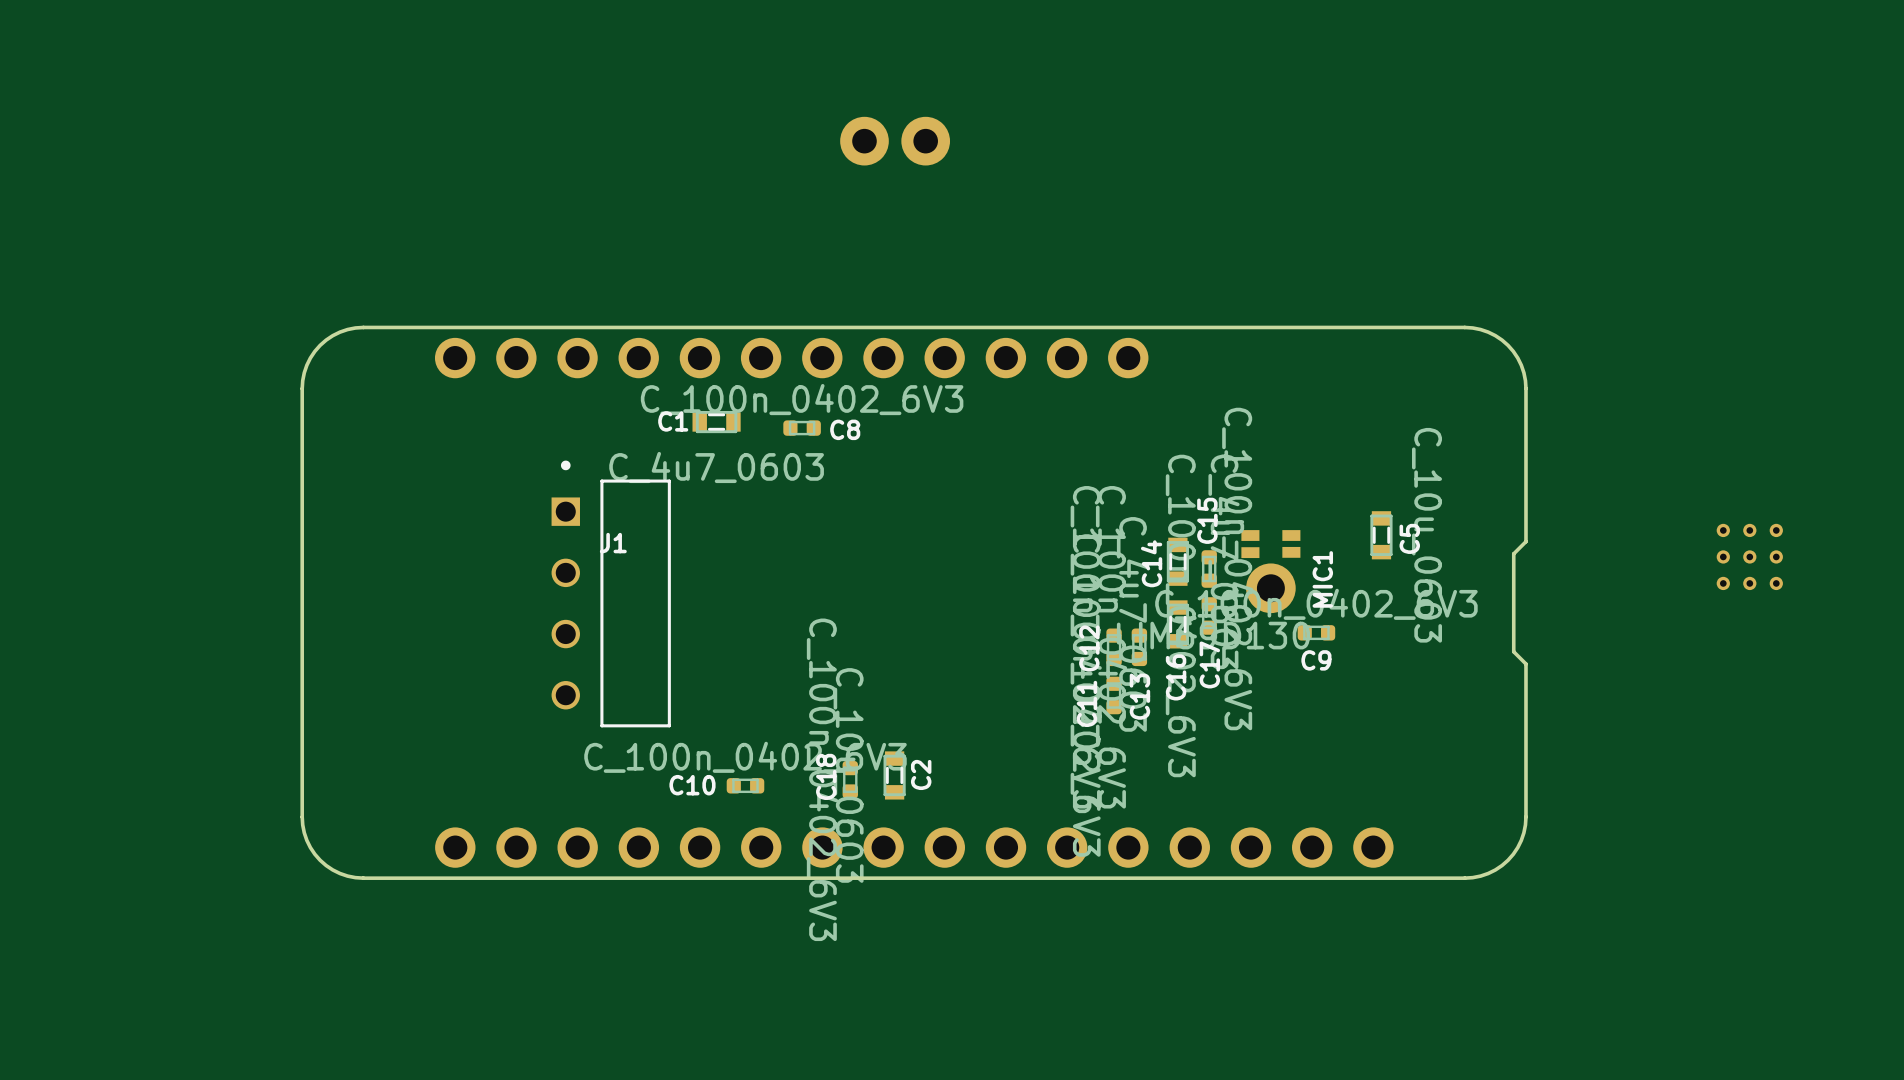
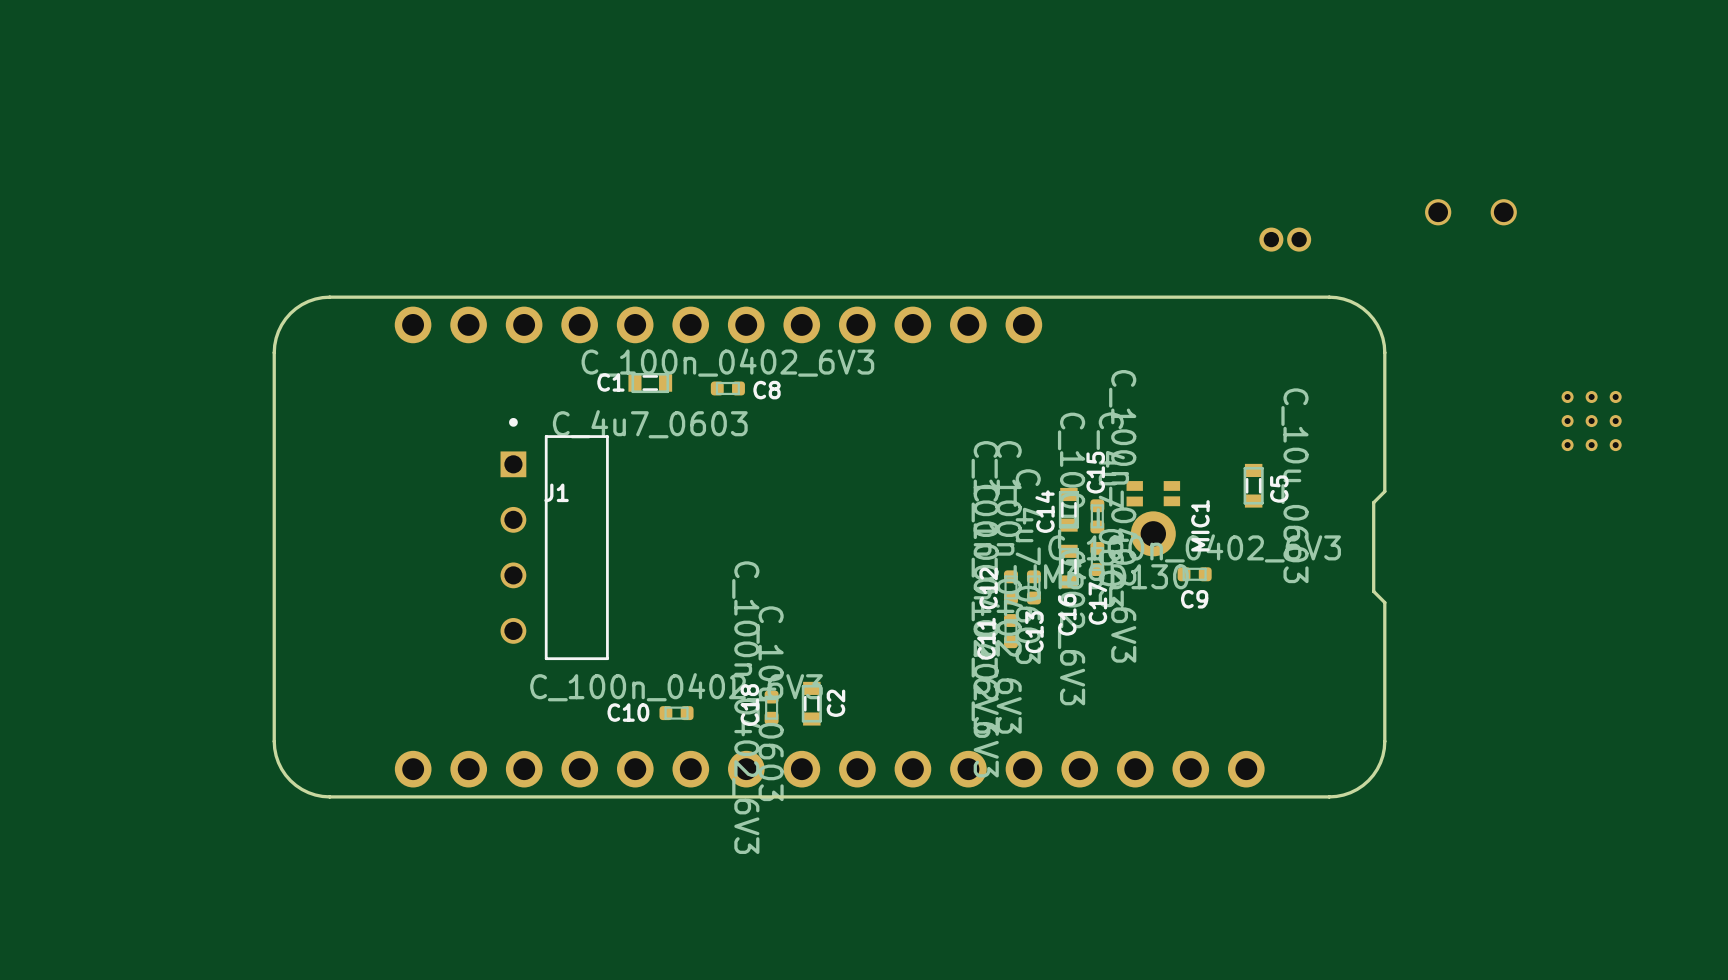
part: (895, 141) -> none
part: none -> (1470, 212)
part: none -> (1285, 239)
part position: (1749, 556) -> (1591, 421)

